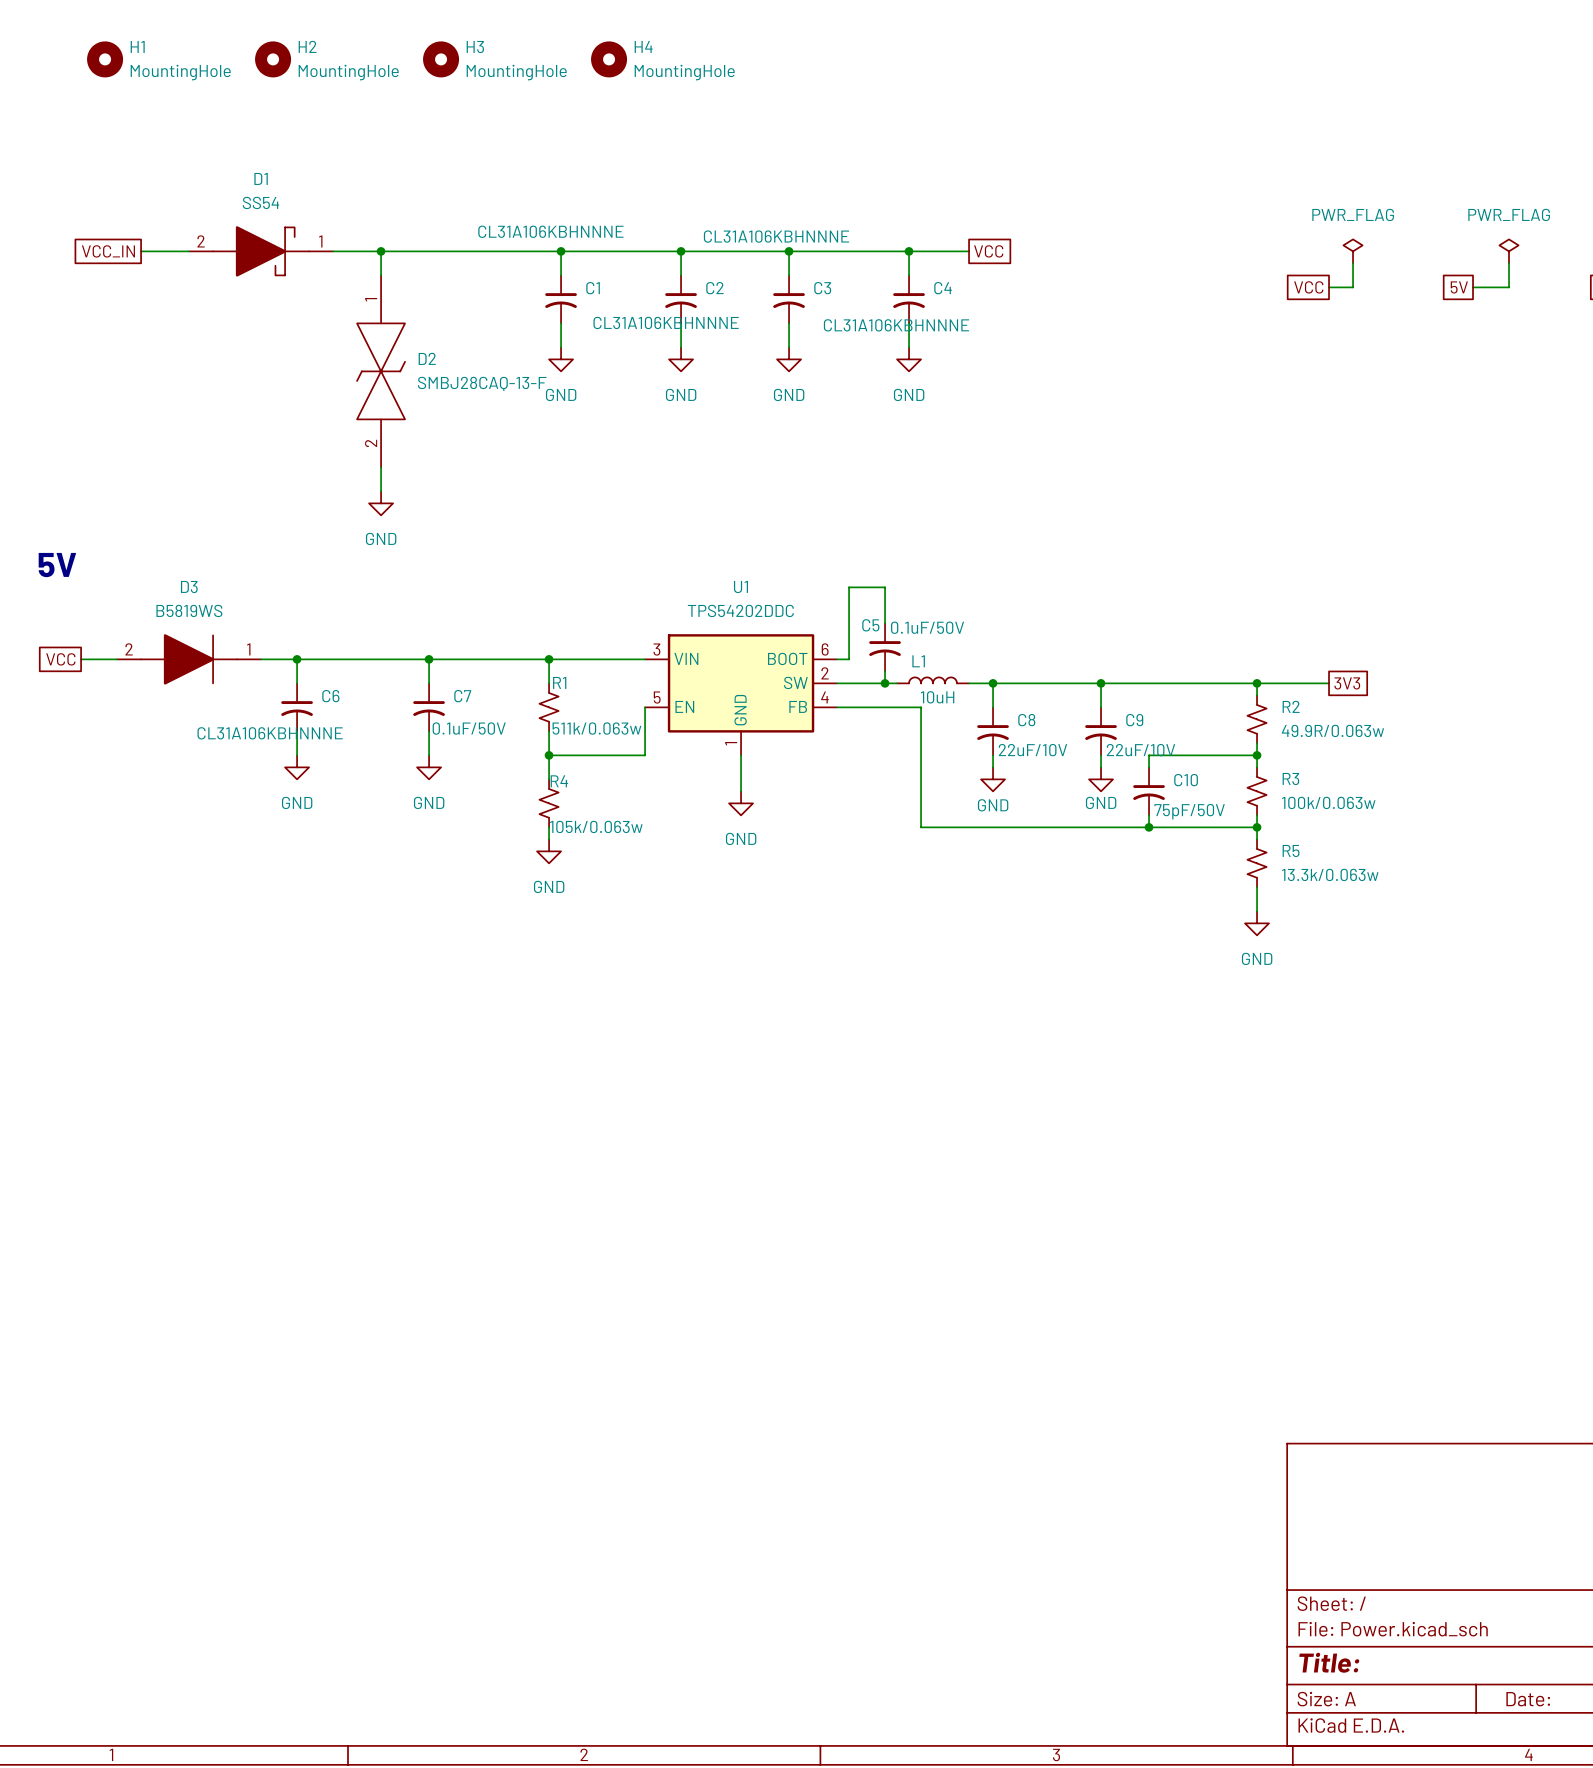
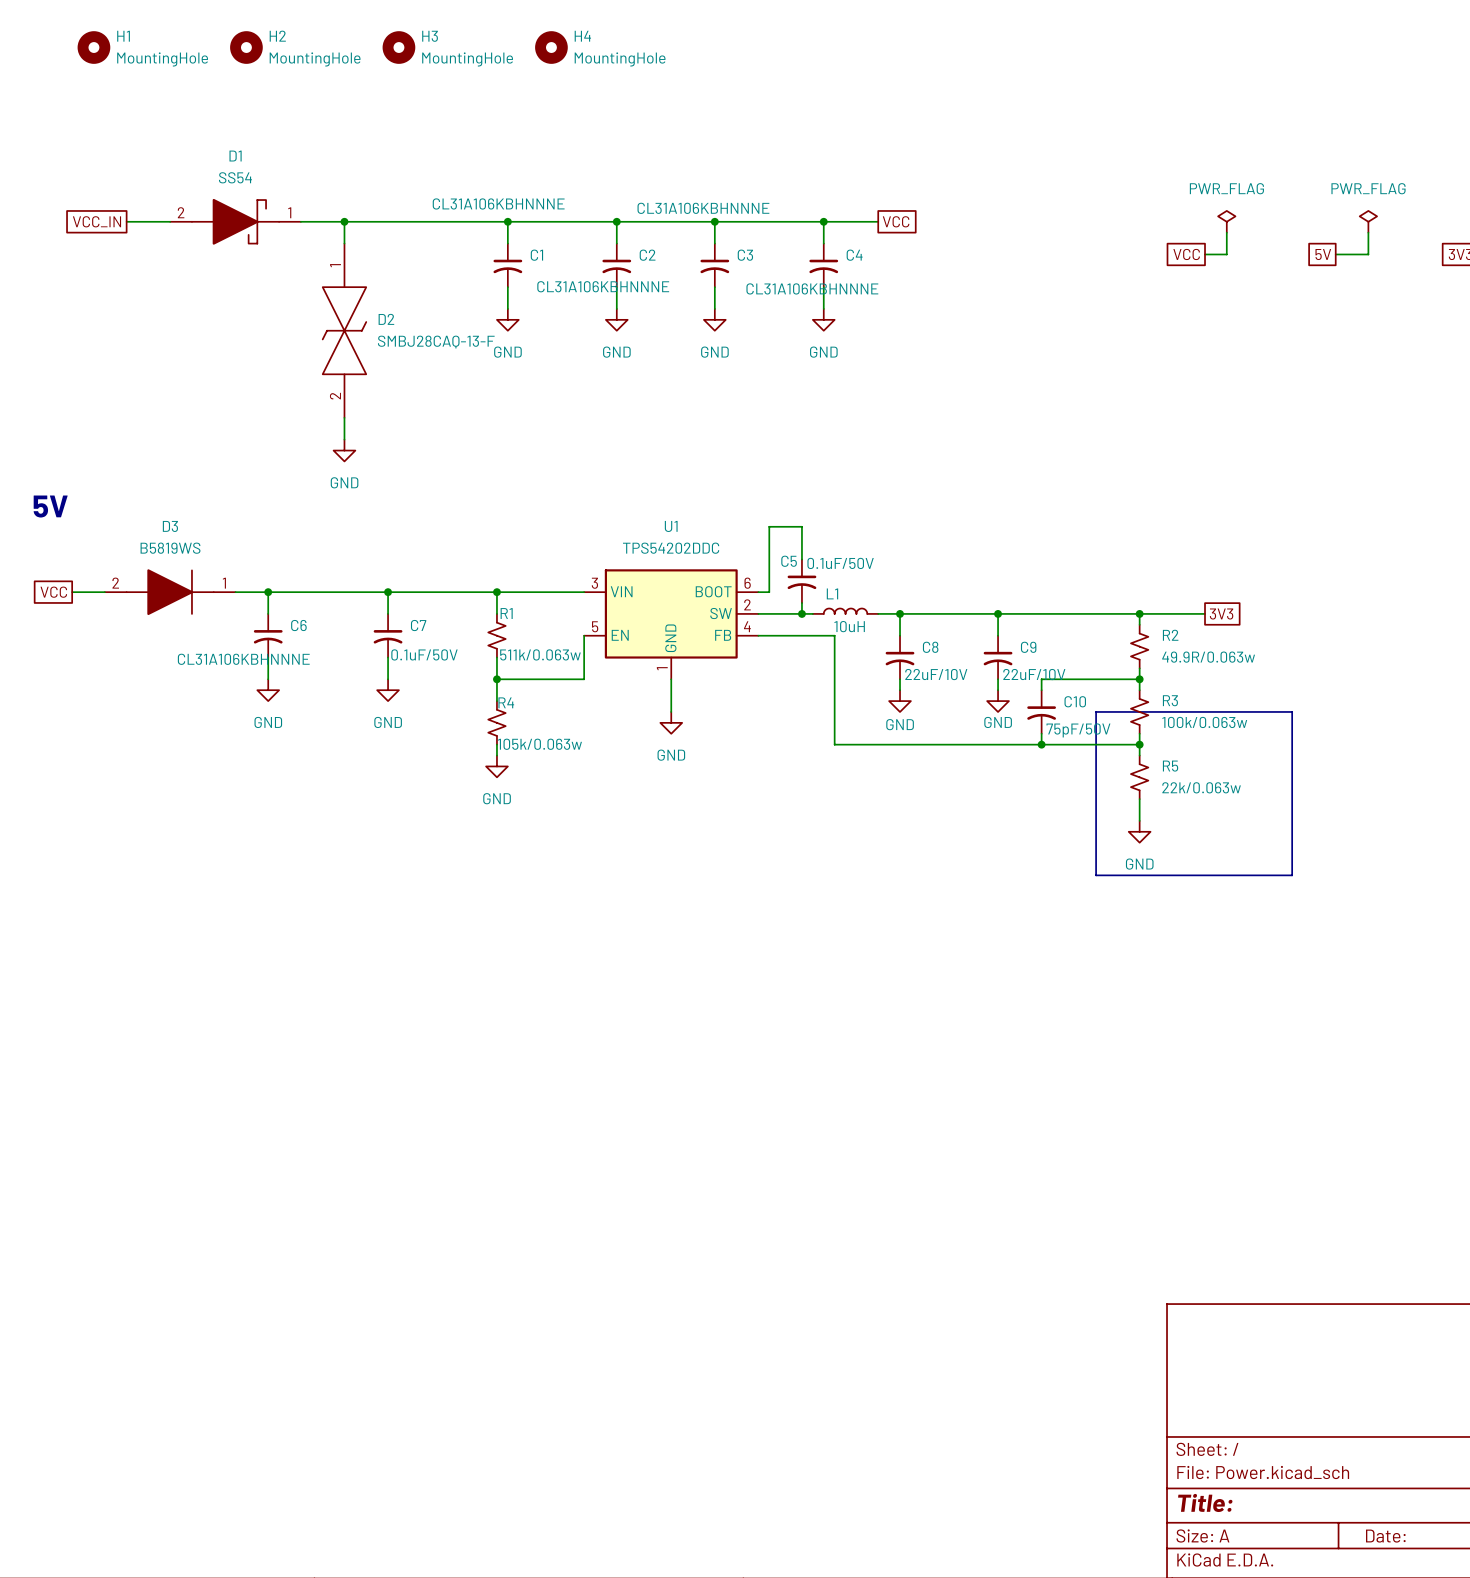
line: none -> (1096, 711) (1292, 711) (1292, 875) (1096, 875) (1096, 711)
R5 value: 13.3k/0.063w (1330, 874) -> 22k/0.063w (1201, 787)

